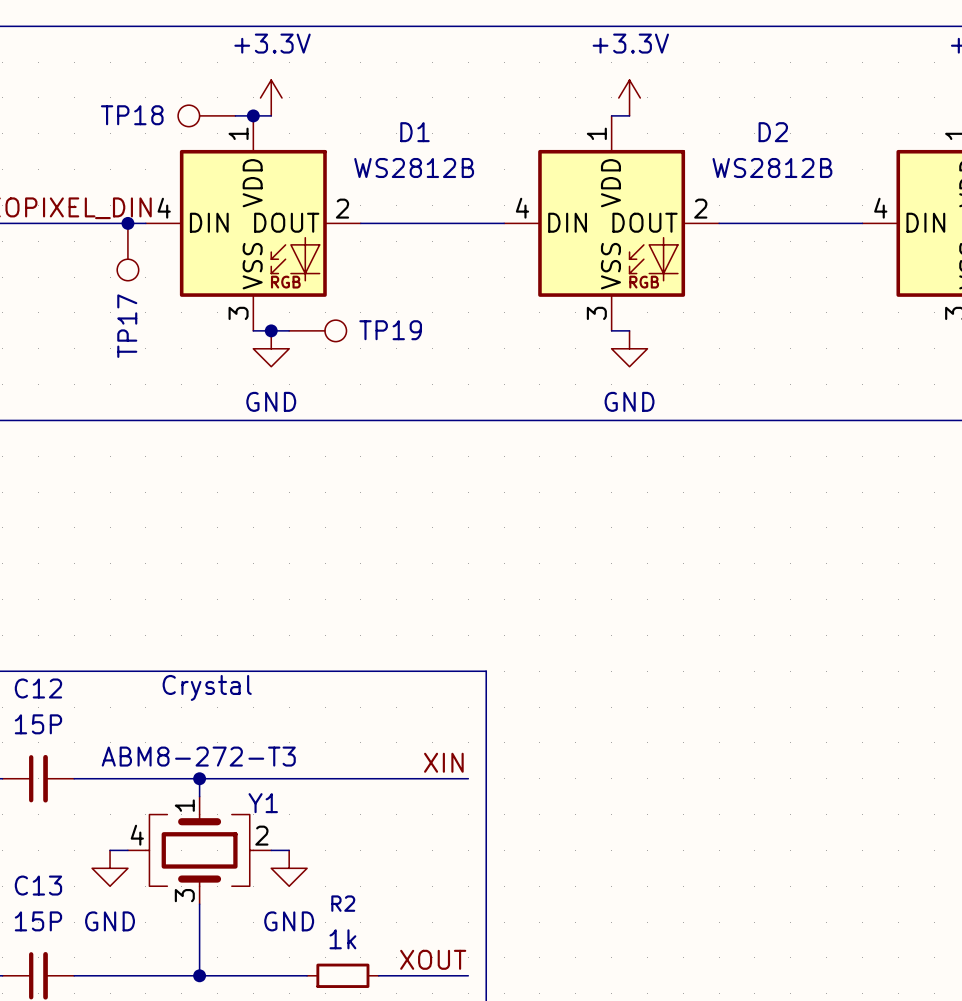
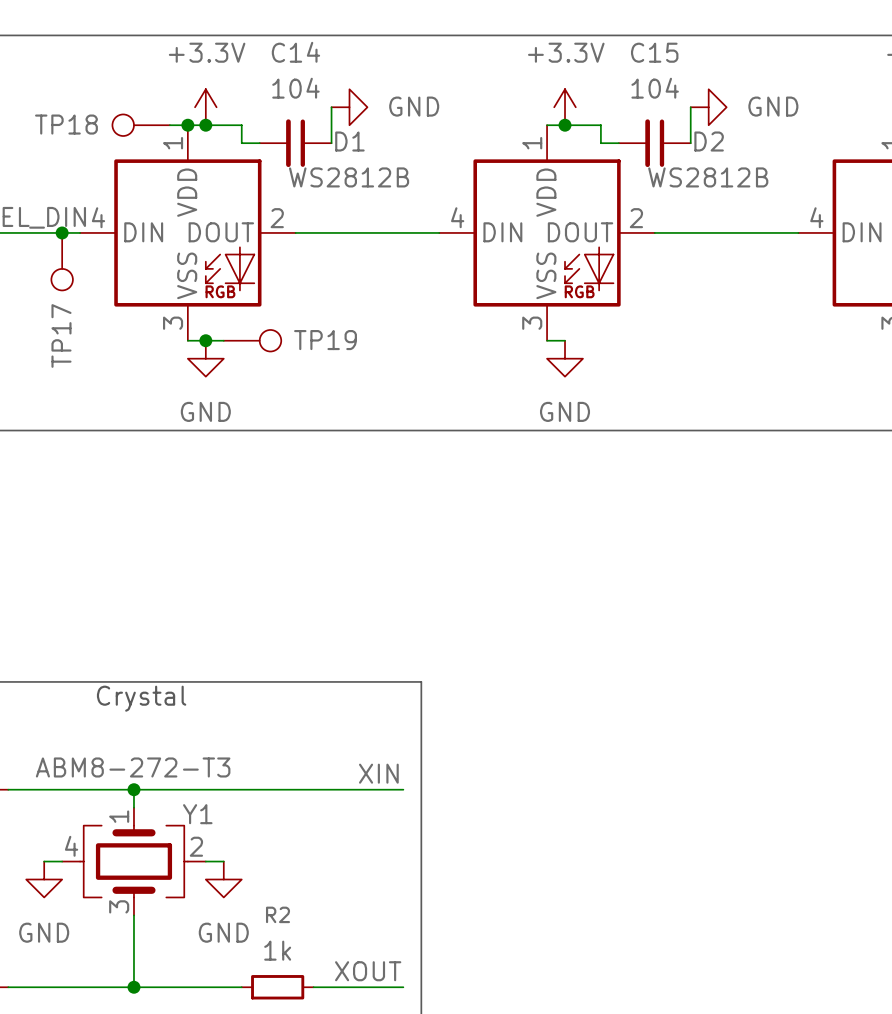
wire: none -> (331, 107) (331, 143)
power symbol: none -> GND (349, 107)
wire: none -> (690, 107) (690, 143)
power symbol: none -> GND (708, 107)
wire: none -> (205, 125) (241, 125) (241, 143) (259, 143)
junction: none -> (205, 125)
wire: none -> (565, 125) (600, 125) (600, 143) (618, 143)
junction: none -> (565, 125)
C14: none -> 104 (295, 143)
C15: none -> 104 (654, 143)

